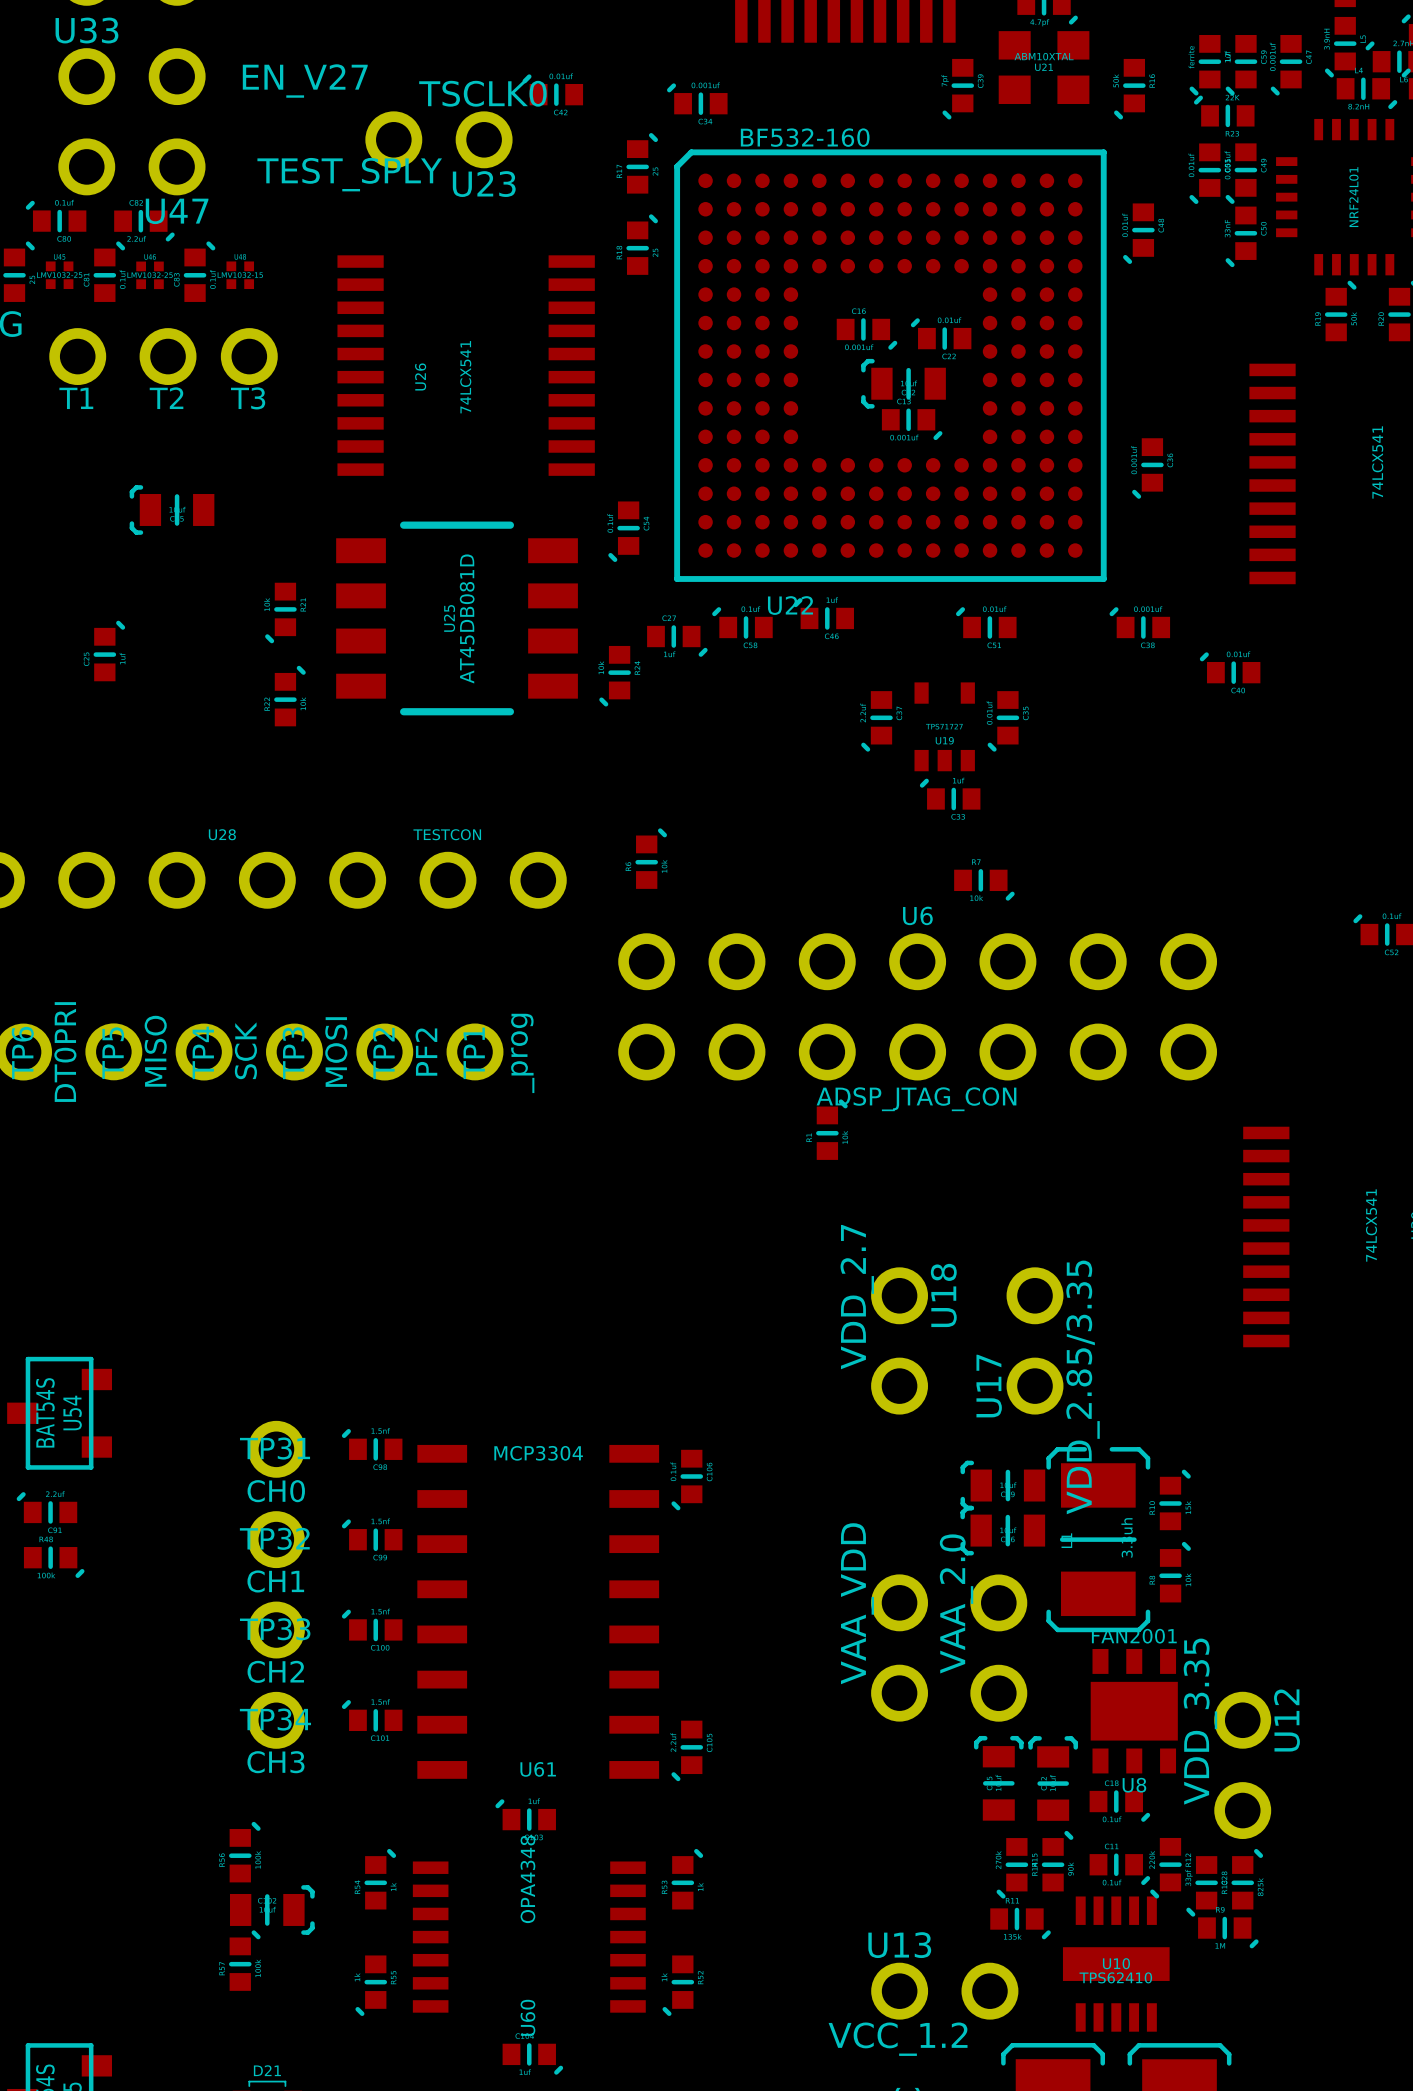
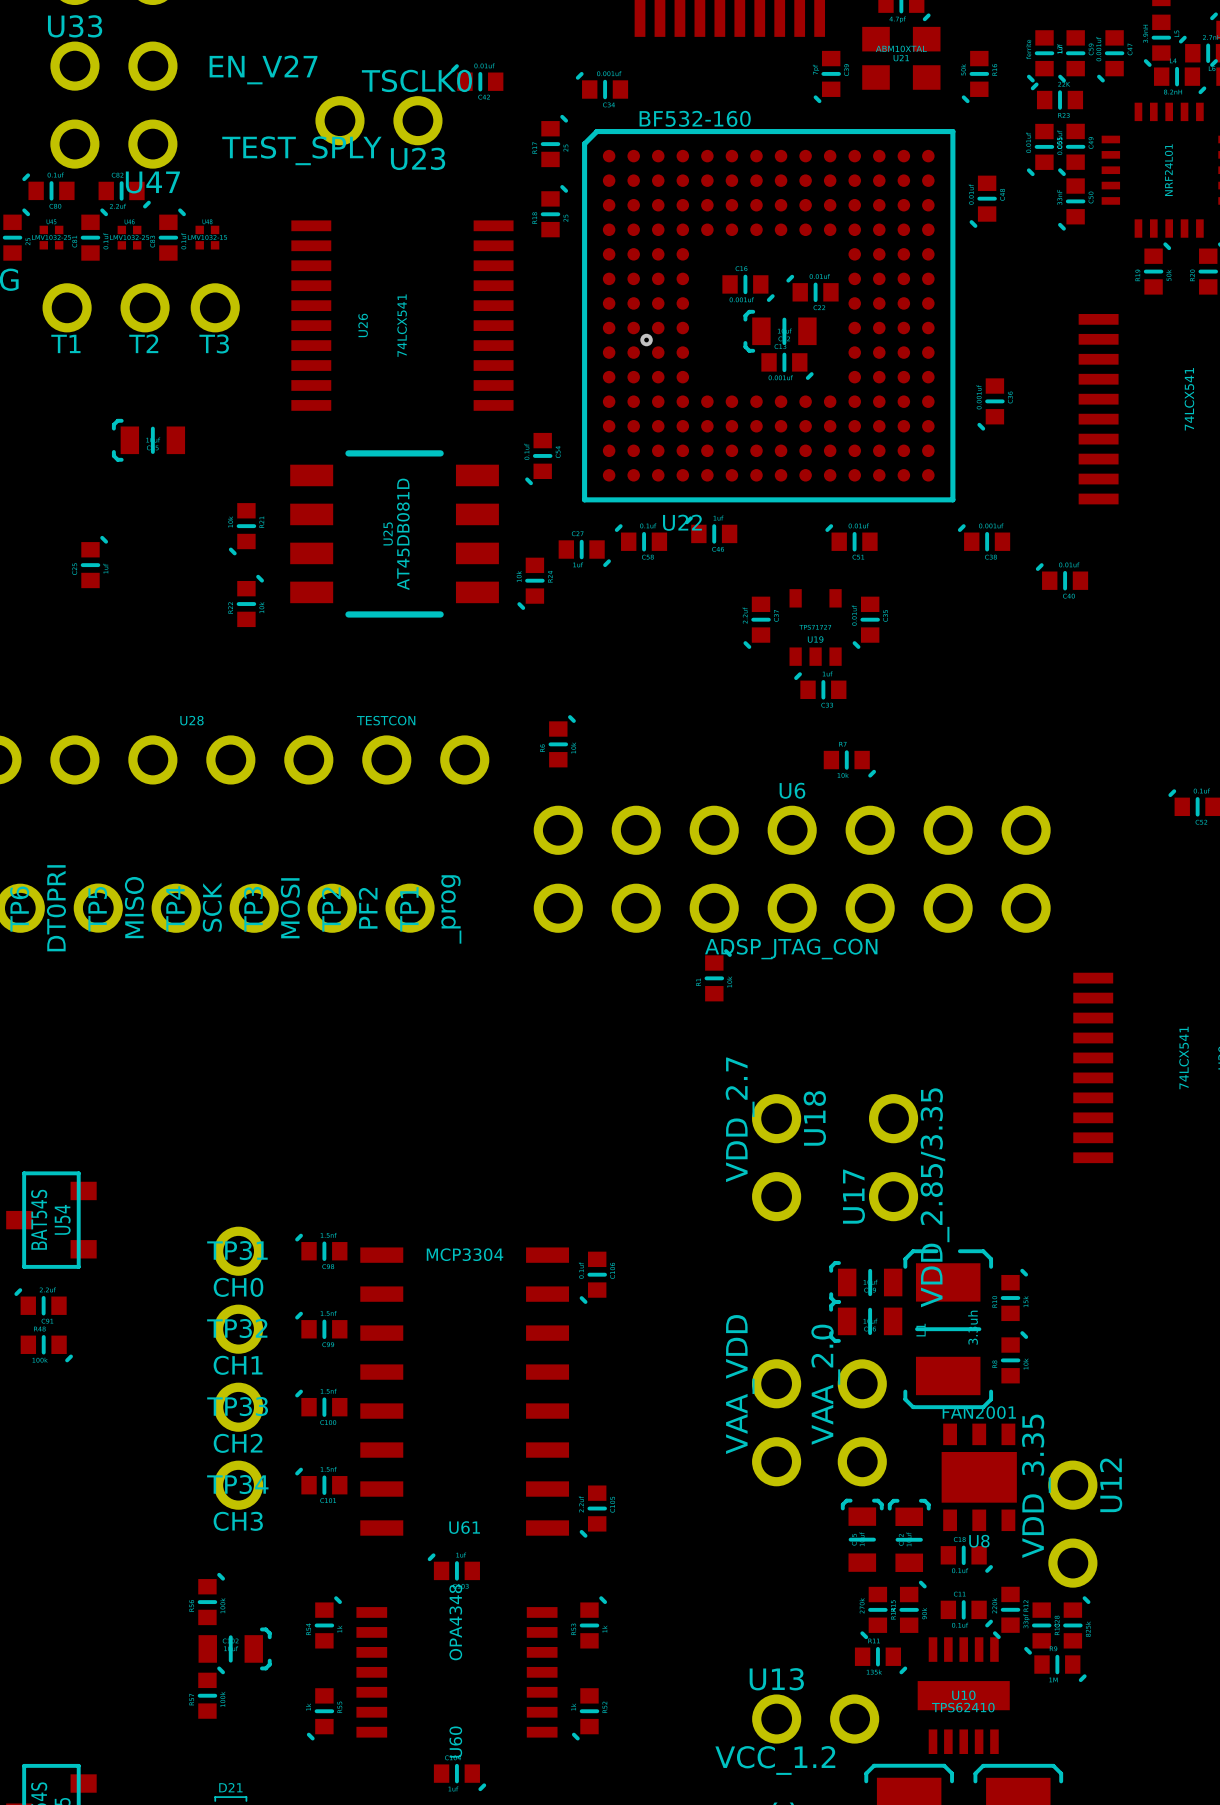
via: none -> (646, 340)

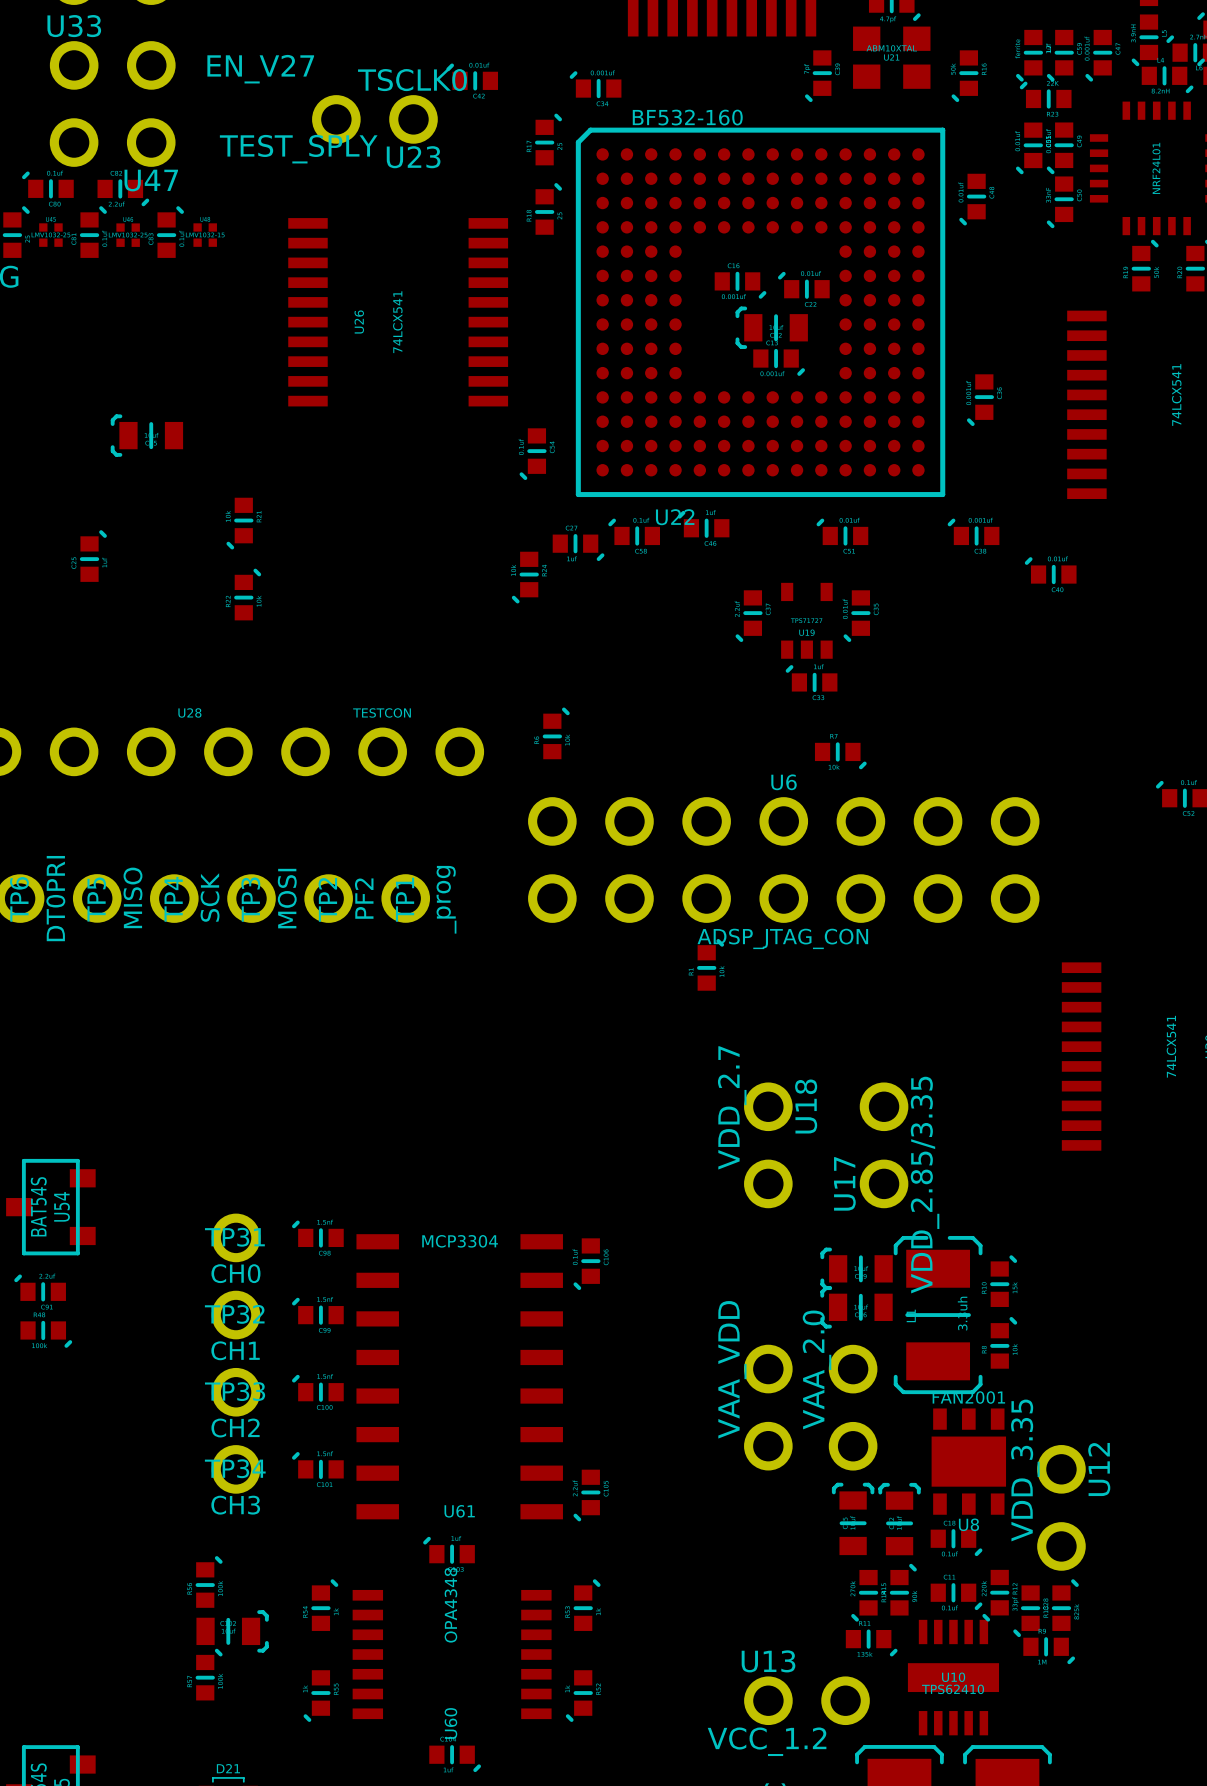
part: T1 (67, 307) -> none
part: T2 (145, 307) -> none
part: T3 (215, 307) -> none
via: (646, 340) -> none
U25: AT45DB081D (394, 533) -> none

